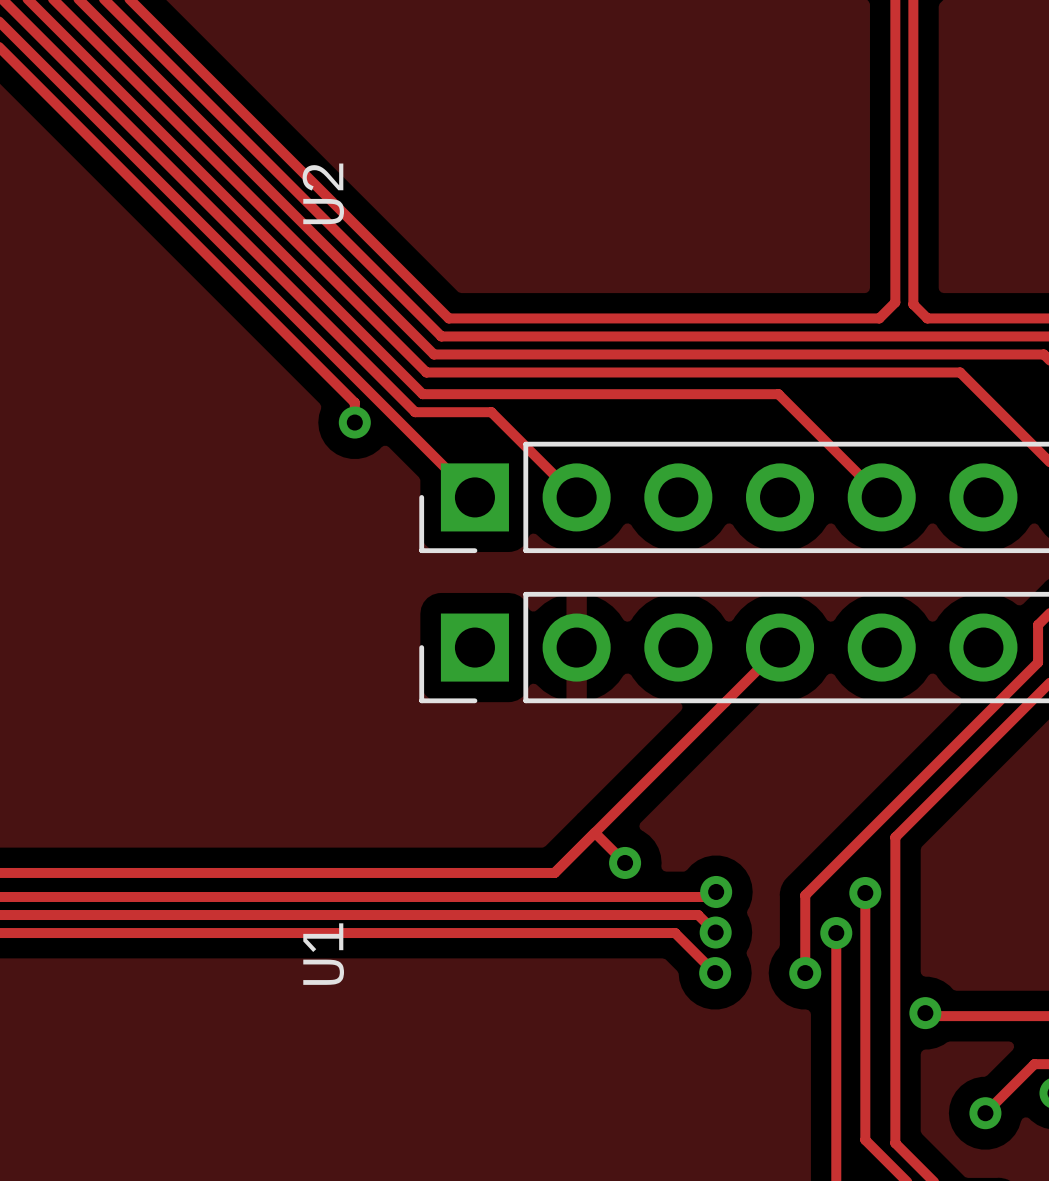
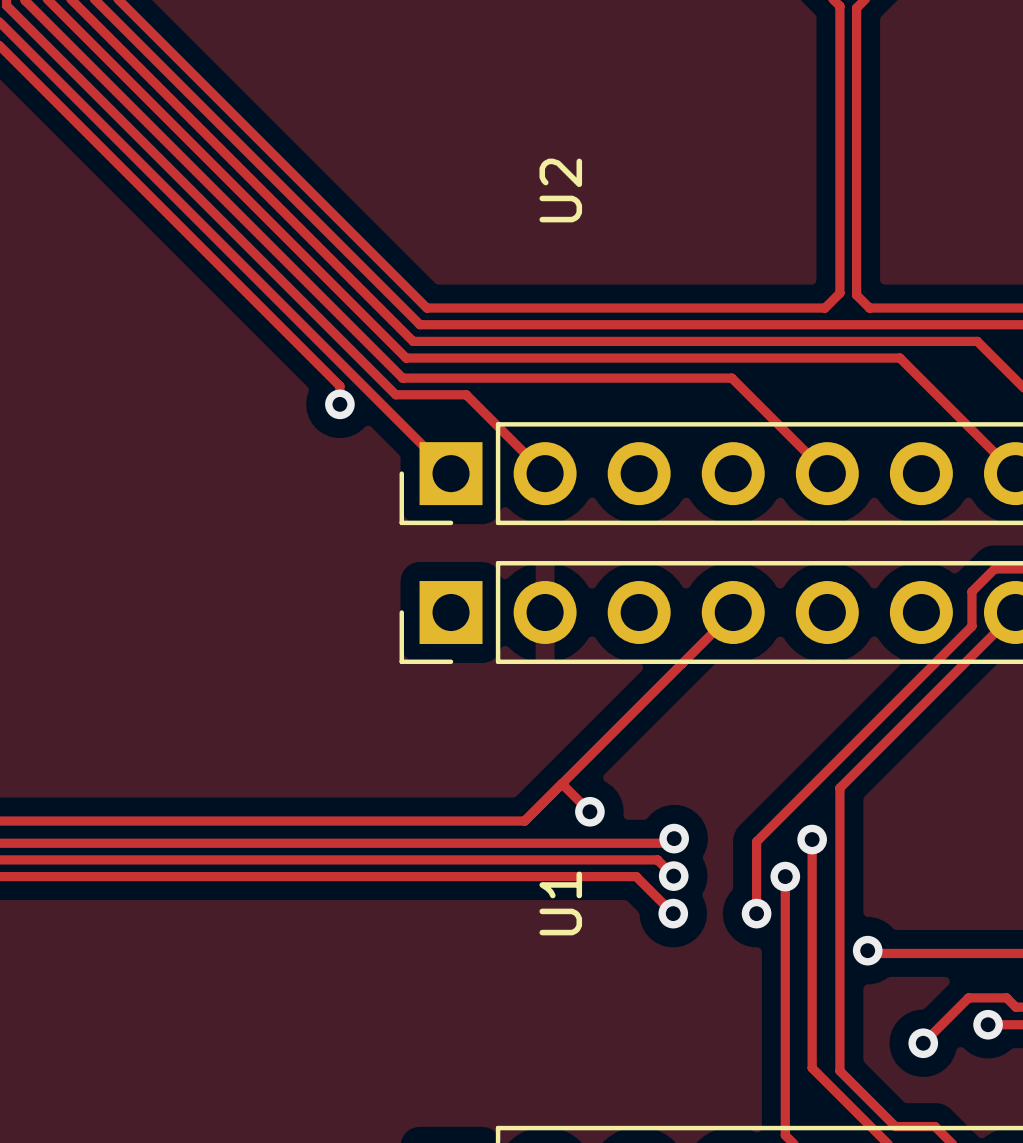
U2 name position: U2 (323, 193) -> U2 (560, 190)
U1 name position: U1 (323, 954) -> U1 (560, 903)

